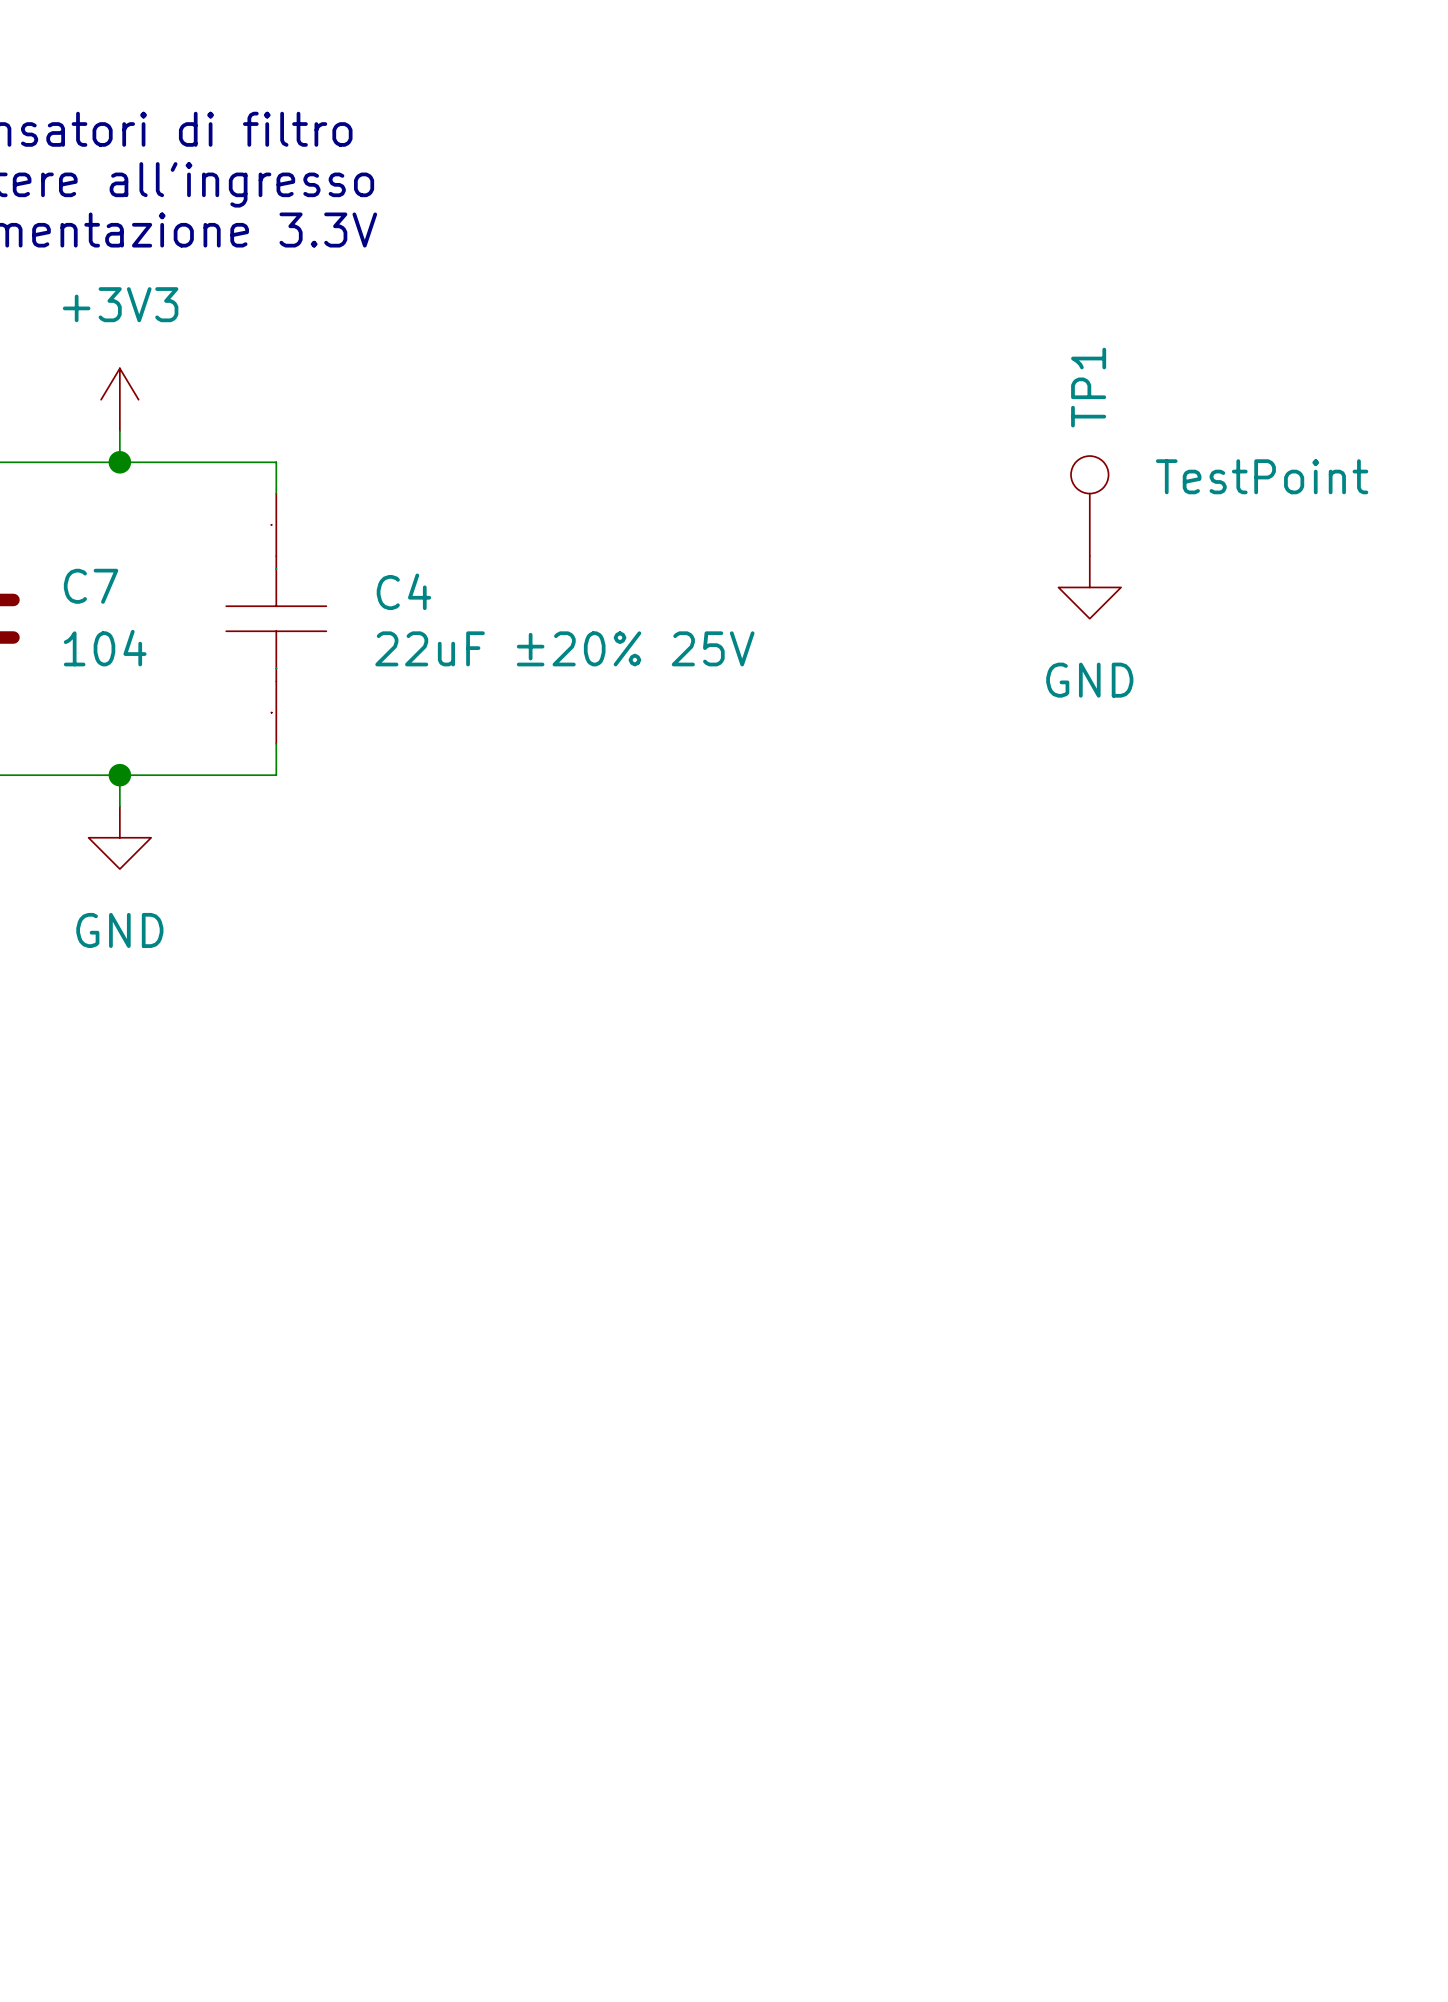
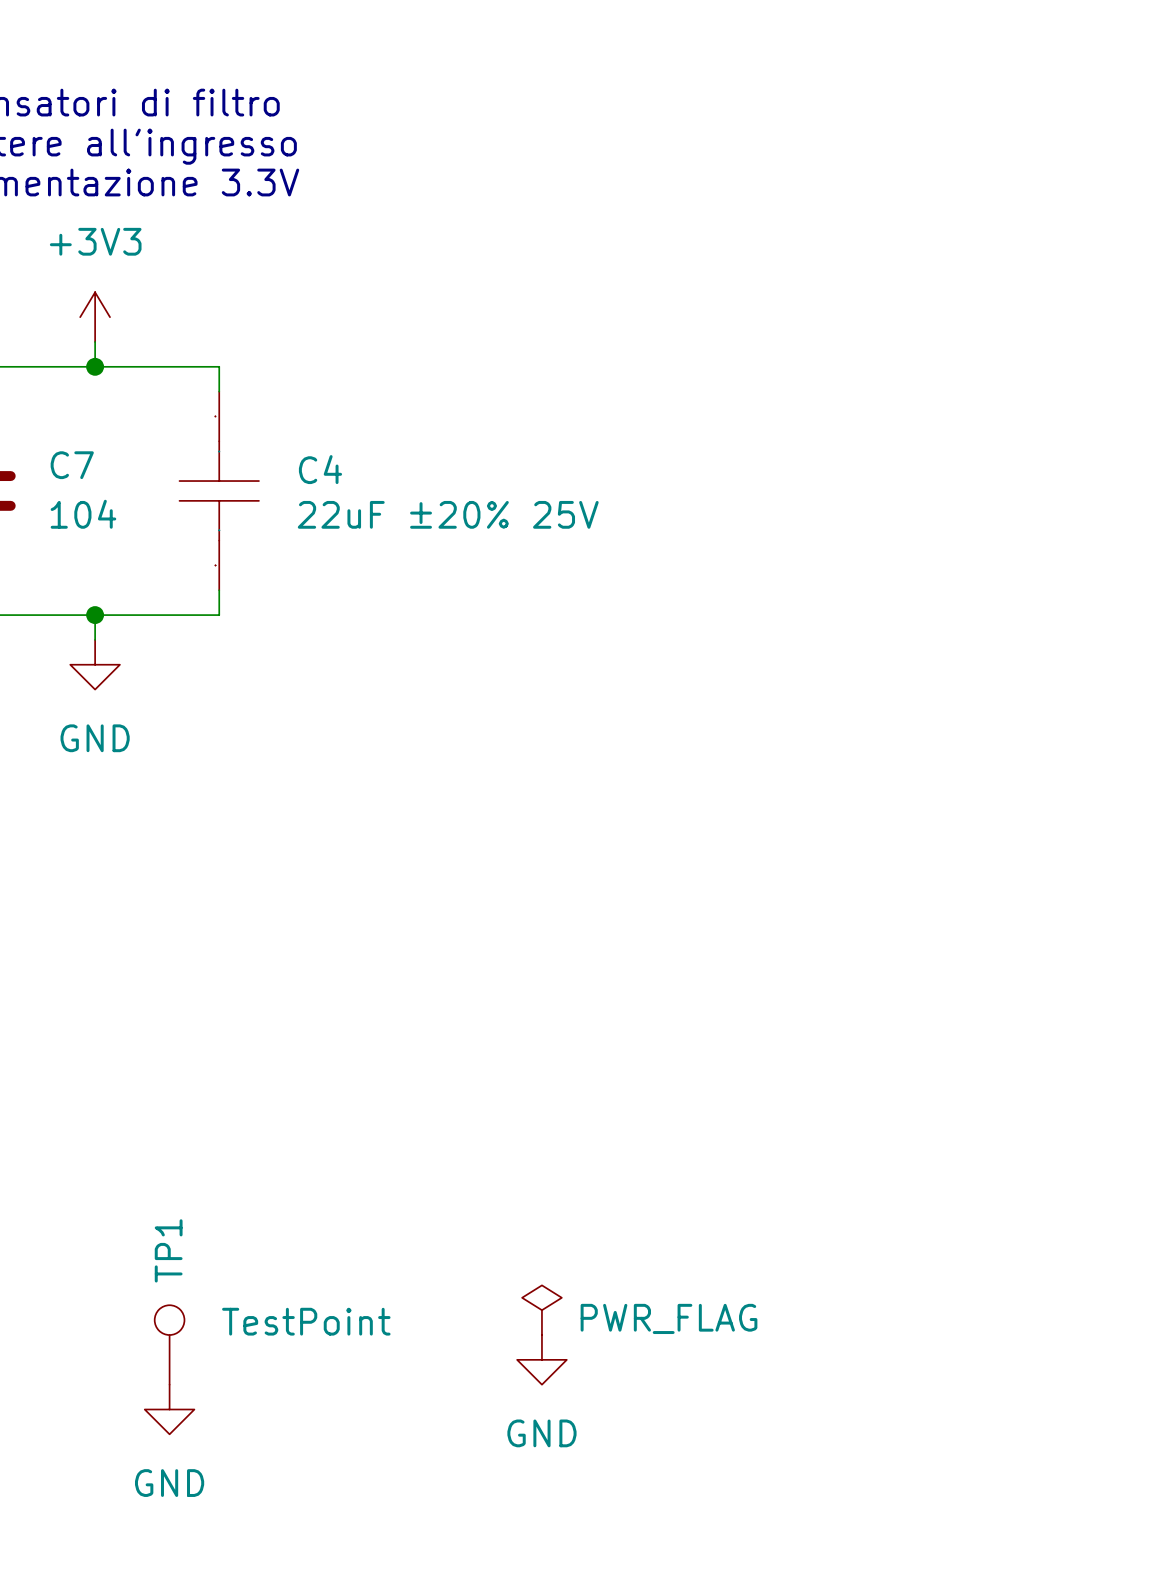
TP1 position: (1089, 506) -> (169, 1344)
power symbol: GND (1089, 587) -> none
power symbol: none -> PWR_FLAG (541, 1310)
power symbol: none -> GND (541, 1359)
power symbol: none -> GND (169, 1409)

